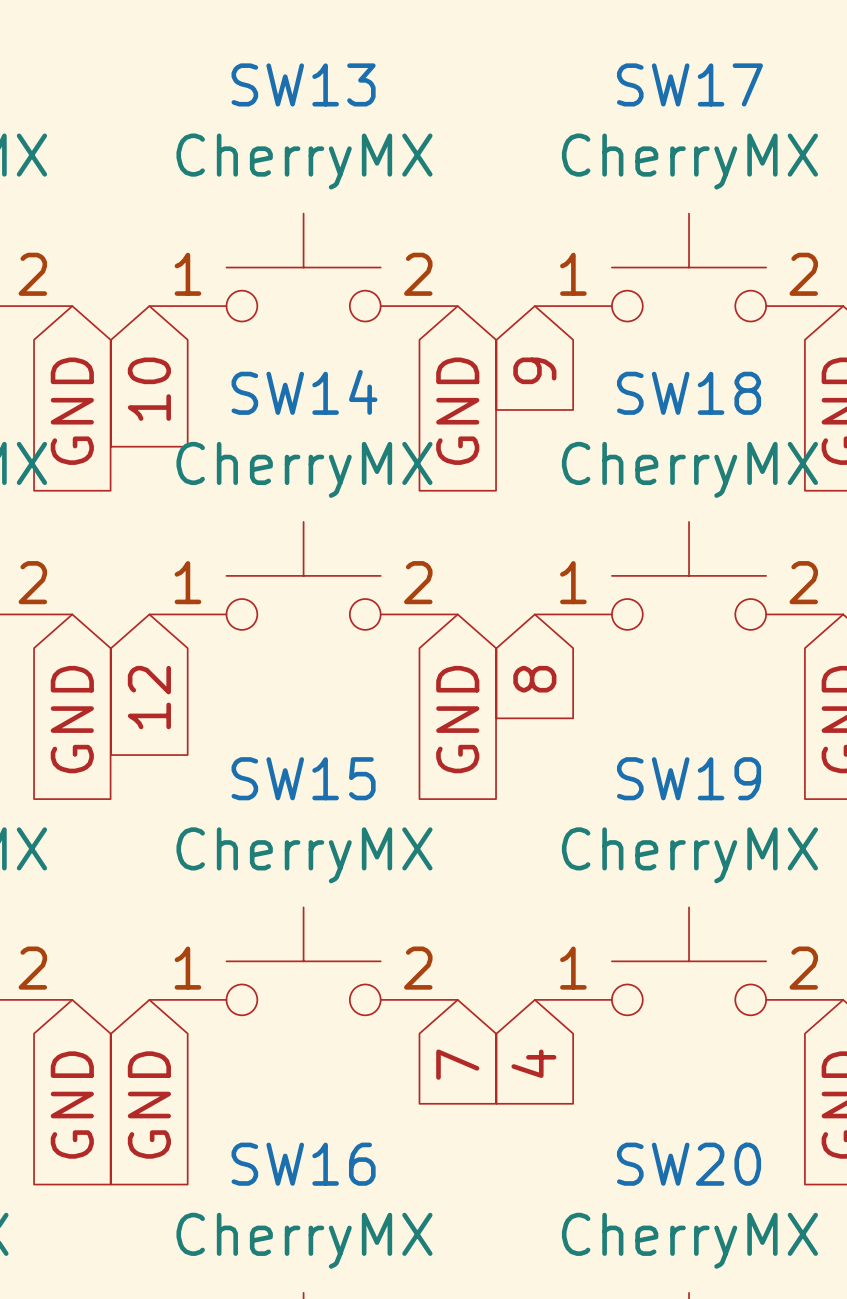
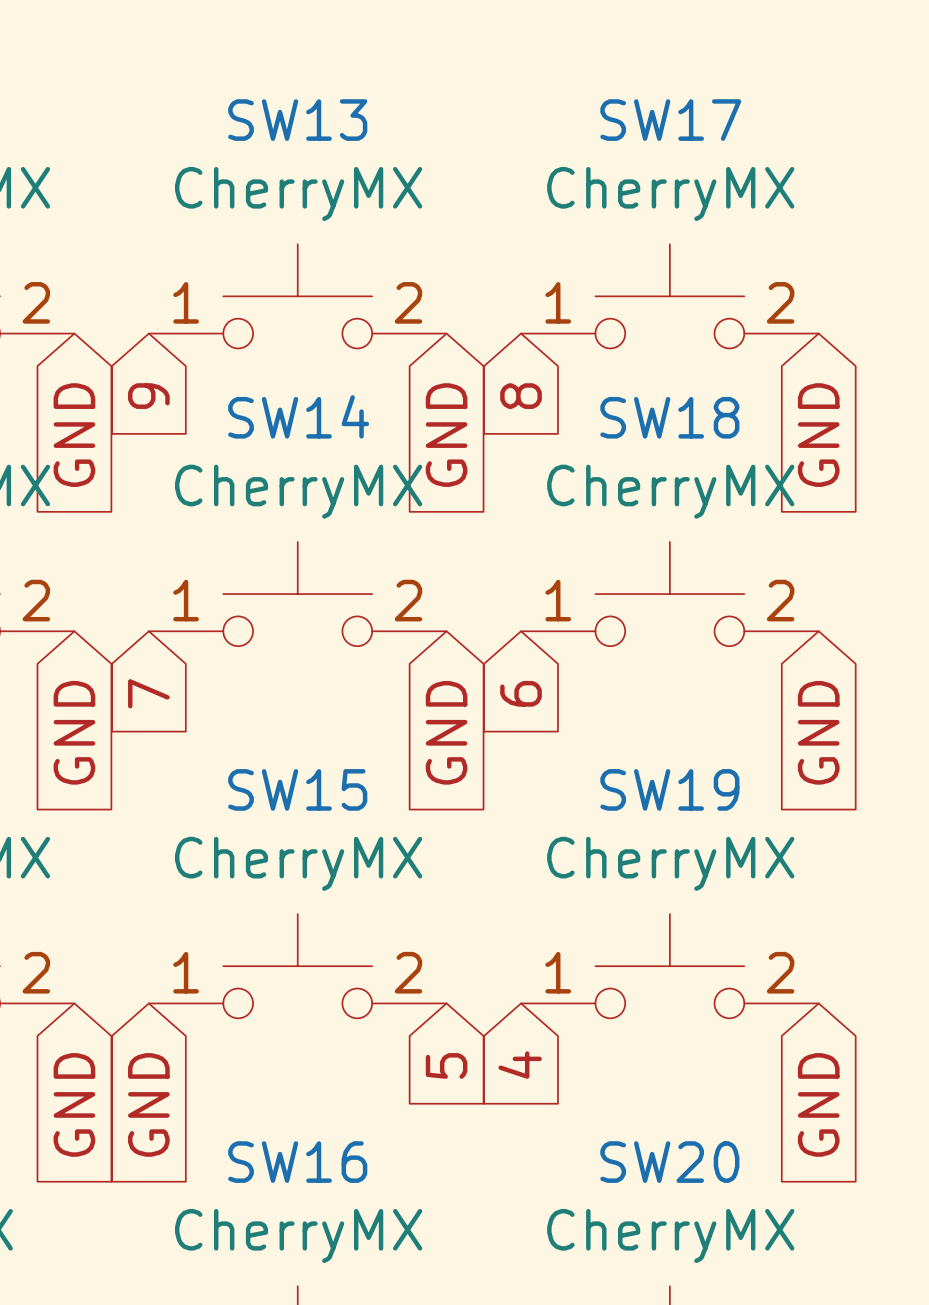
global label: 9 (534, 370) -> 8 (521, 396)
global label: 10 (149, 389) -> 9 (148, 396)
global label: 8 (534, 679) -> 6 (521, 693)
global label: 12 (149, 697) -> 7 (148, 693)
global label: 7 (457, 1064) -> 5 (446, 1065)

